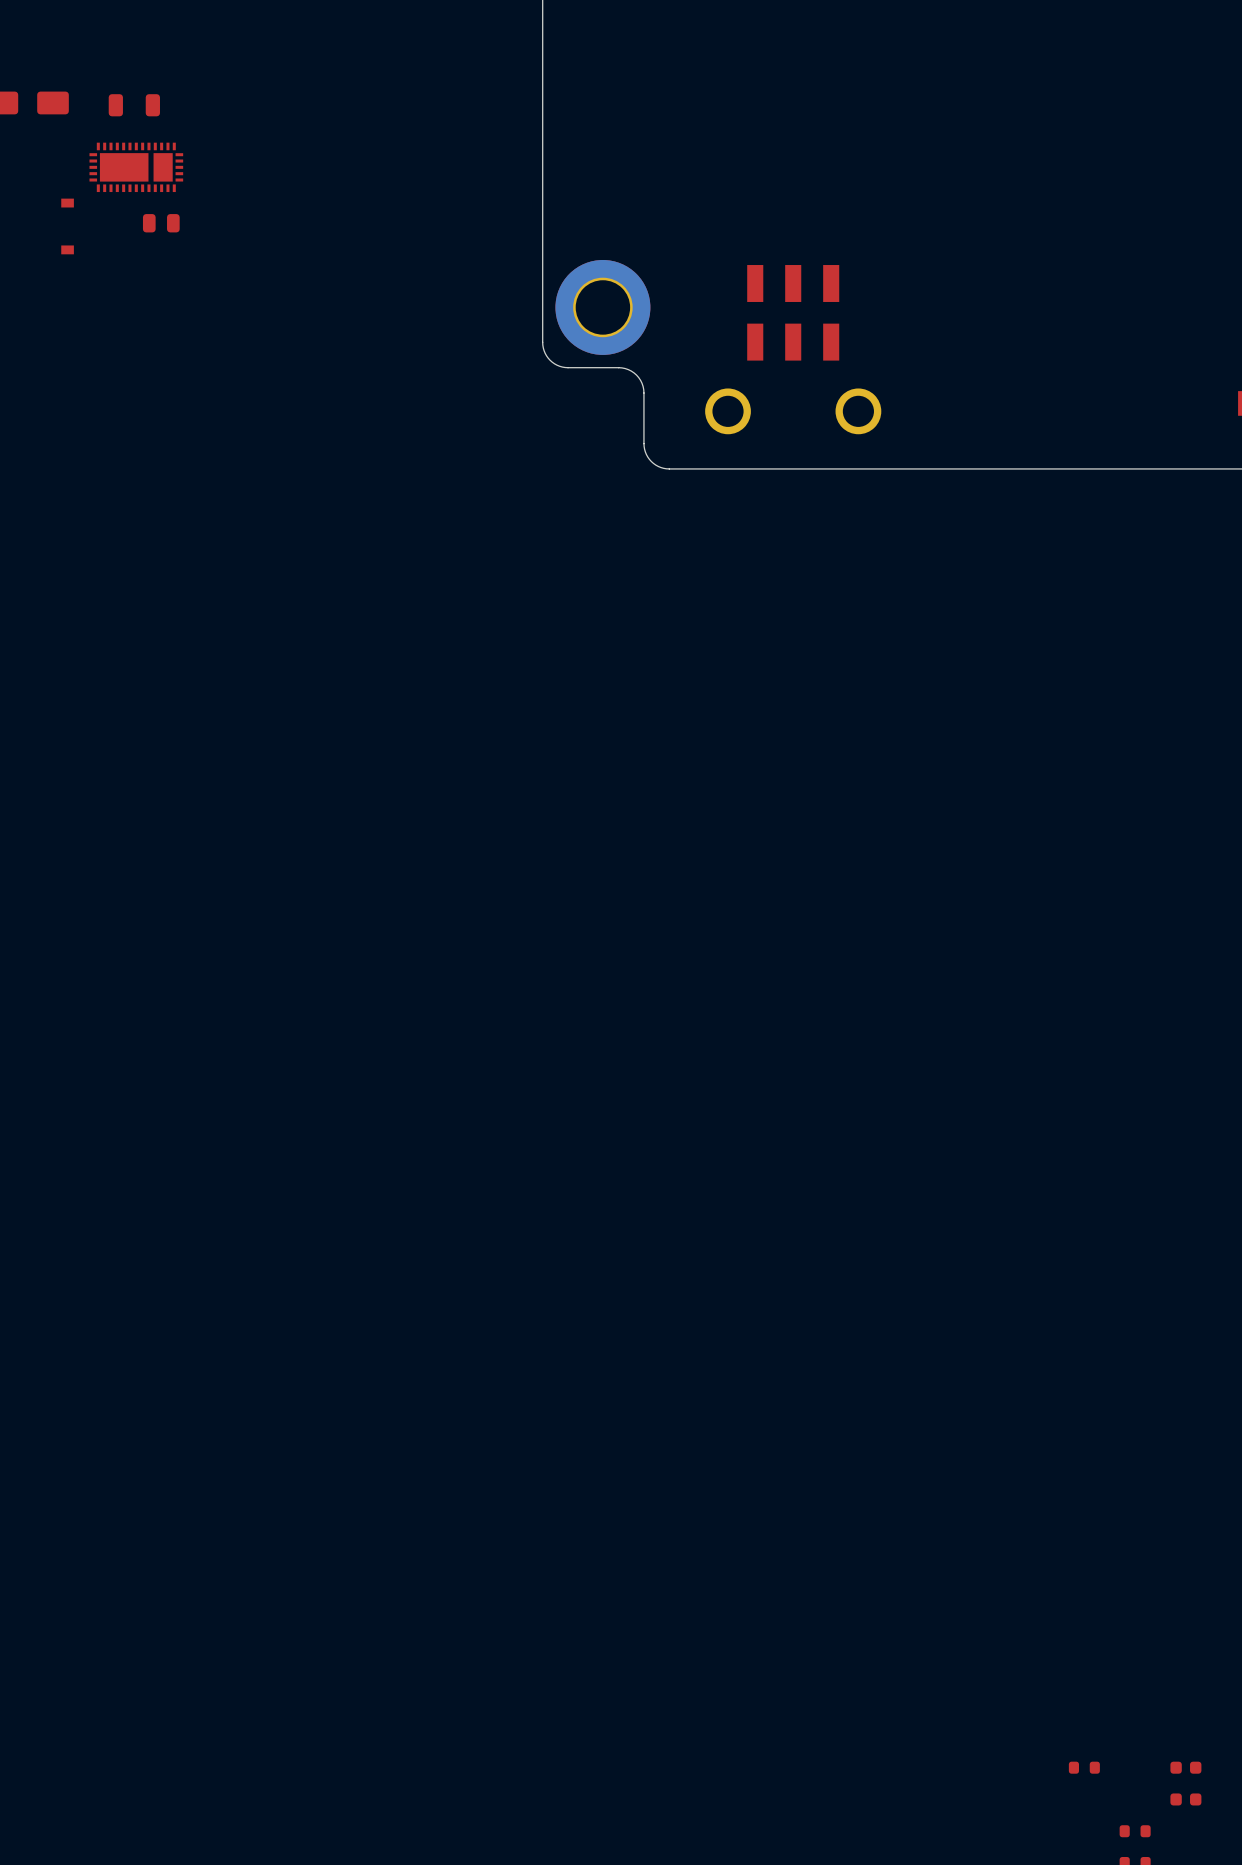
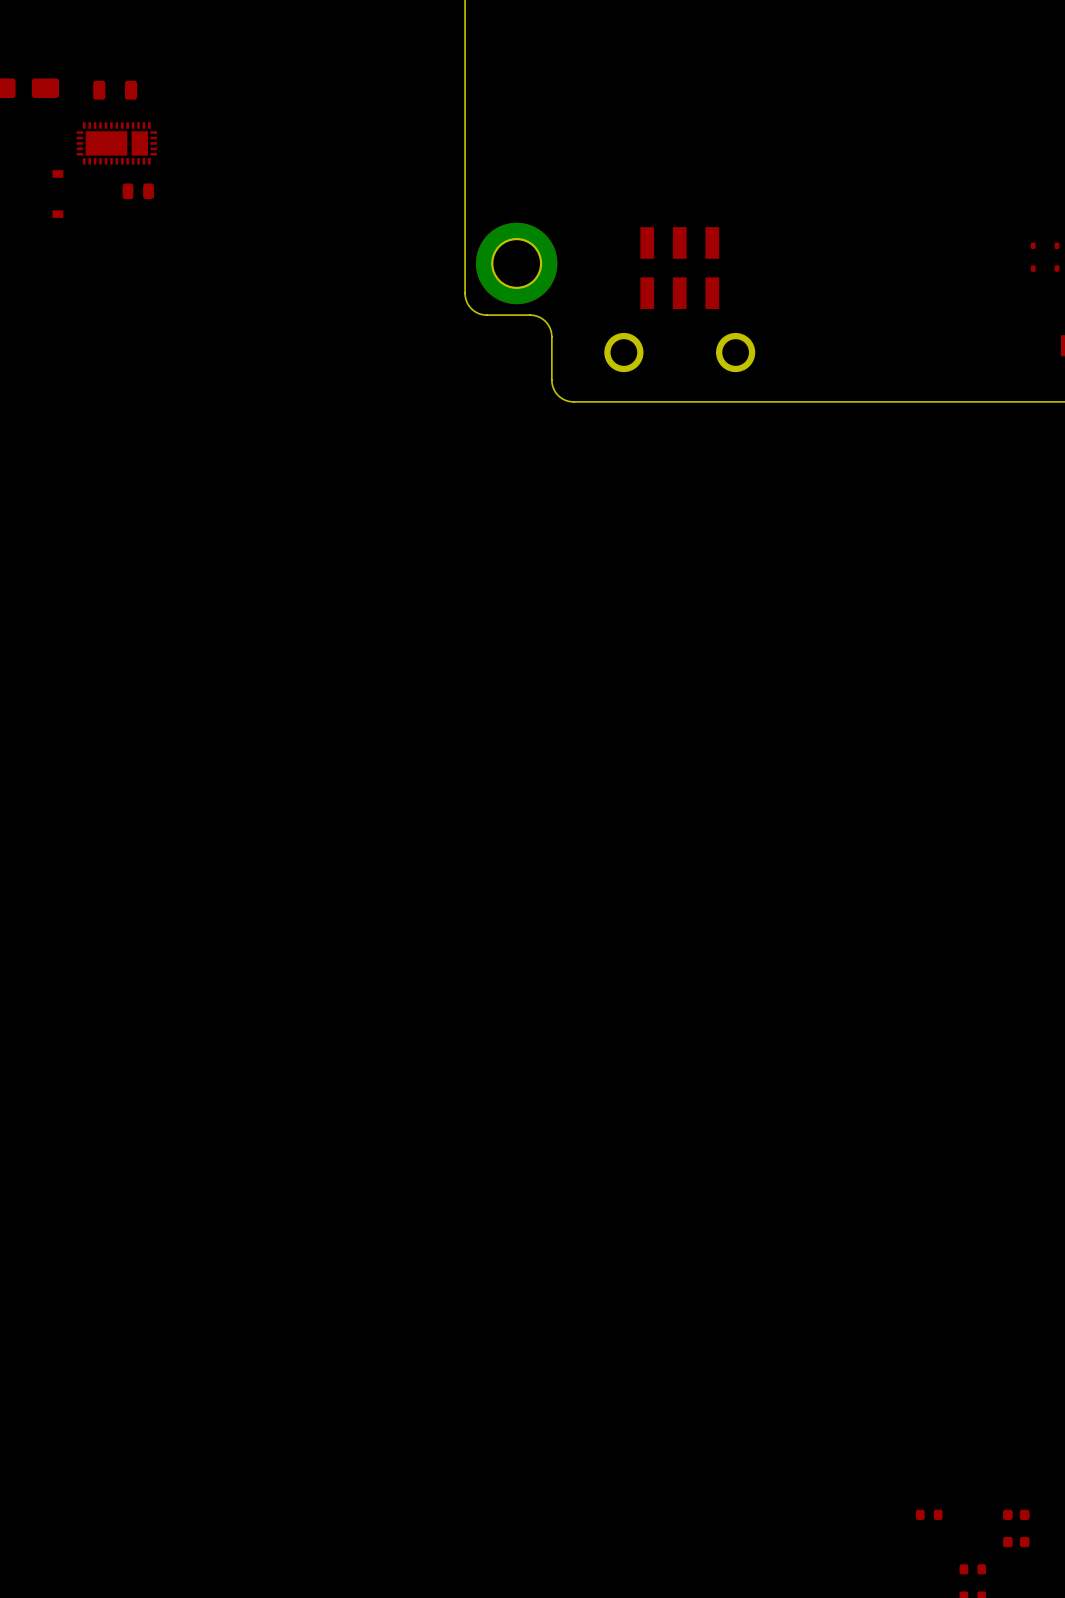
part: none -> (1033, 257)
part: none -> (1057, 257)

